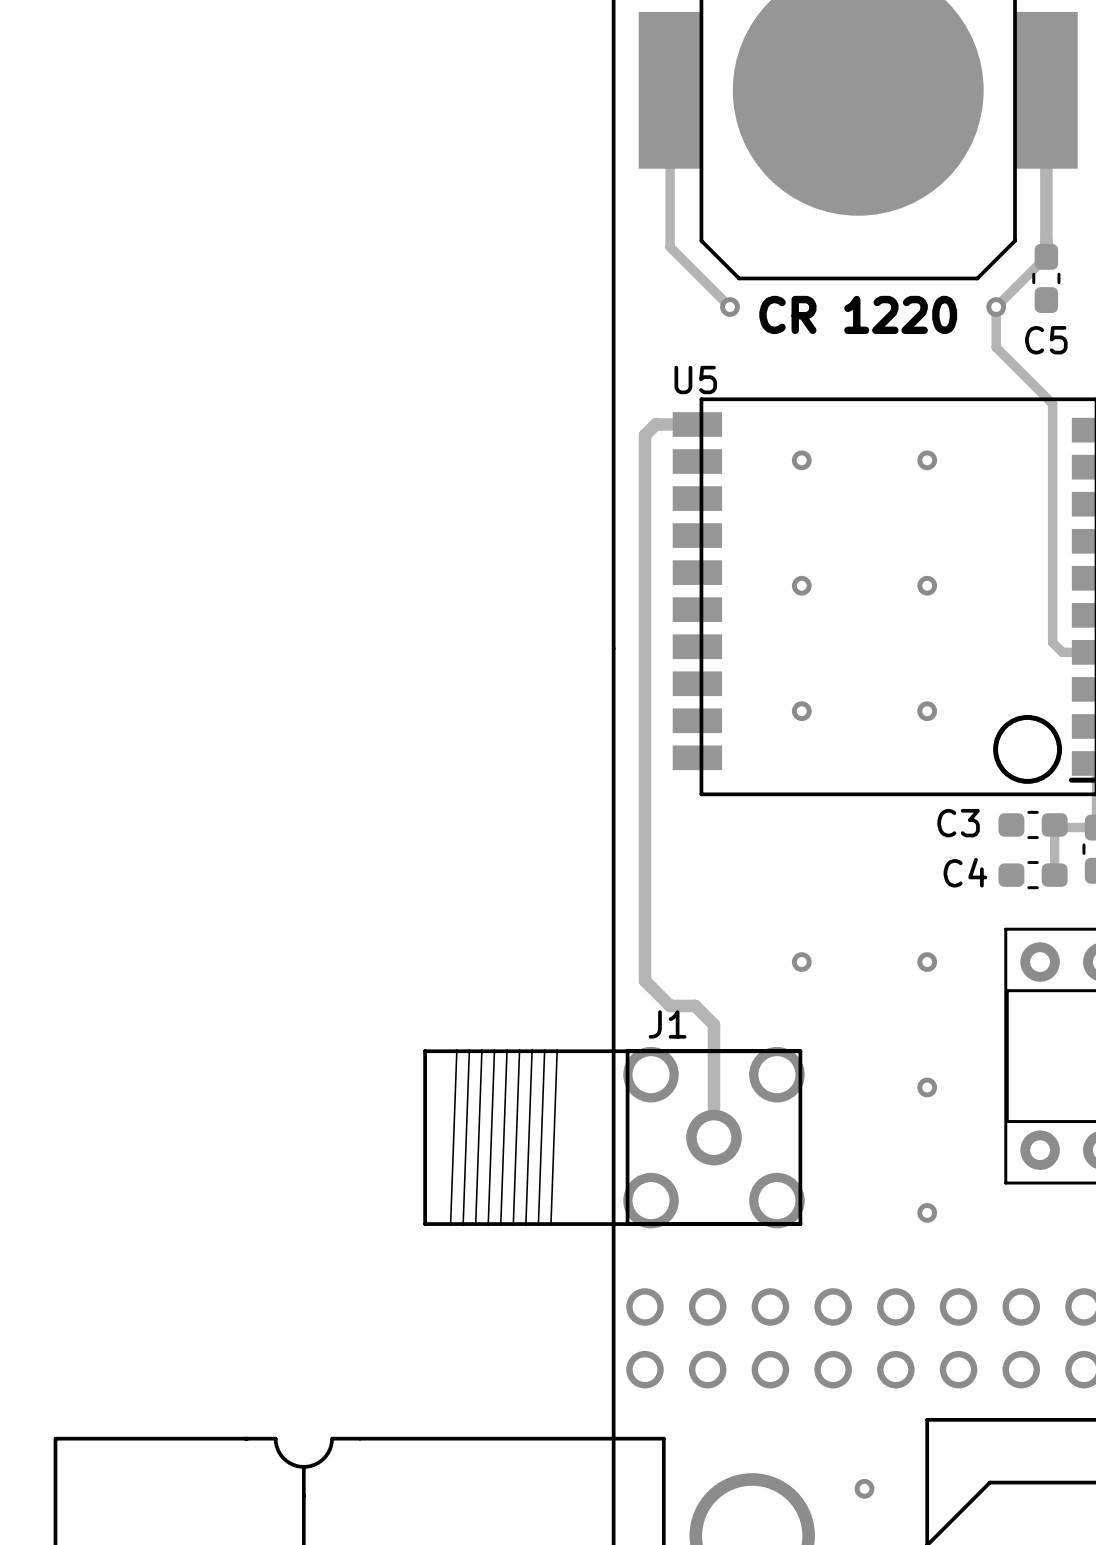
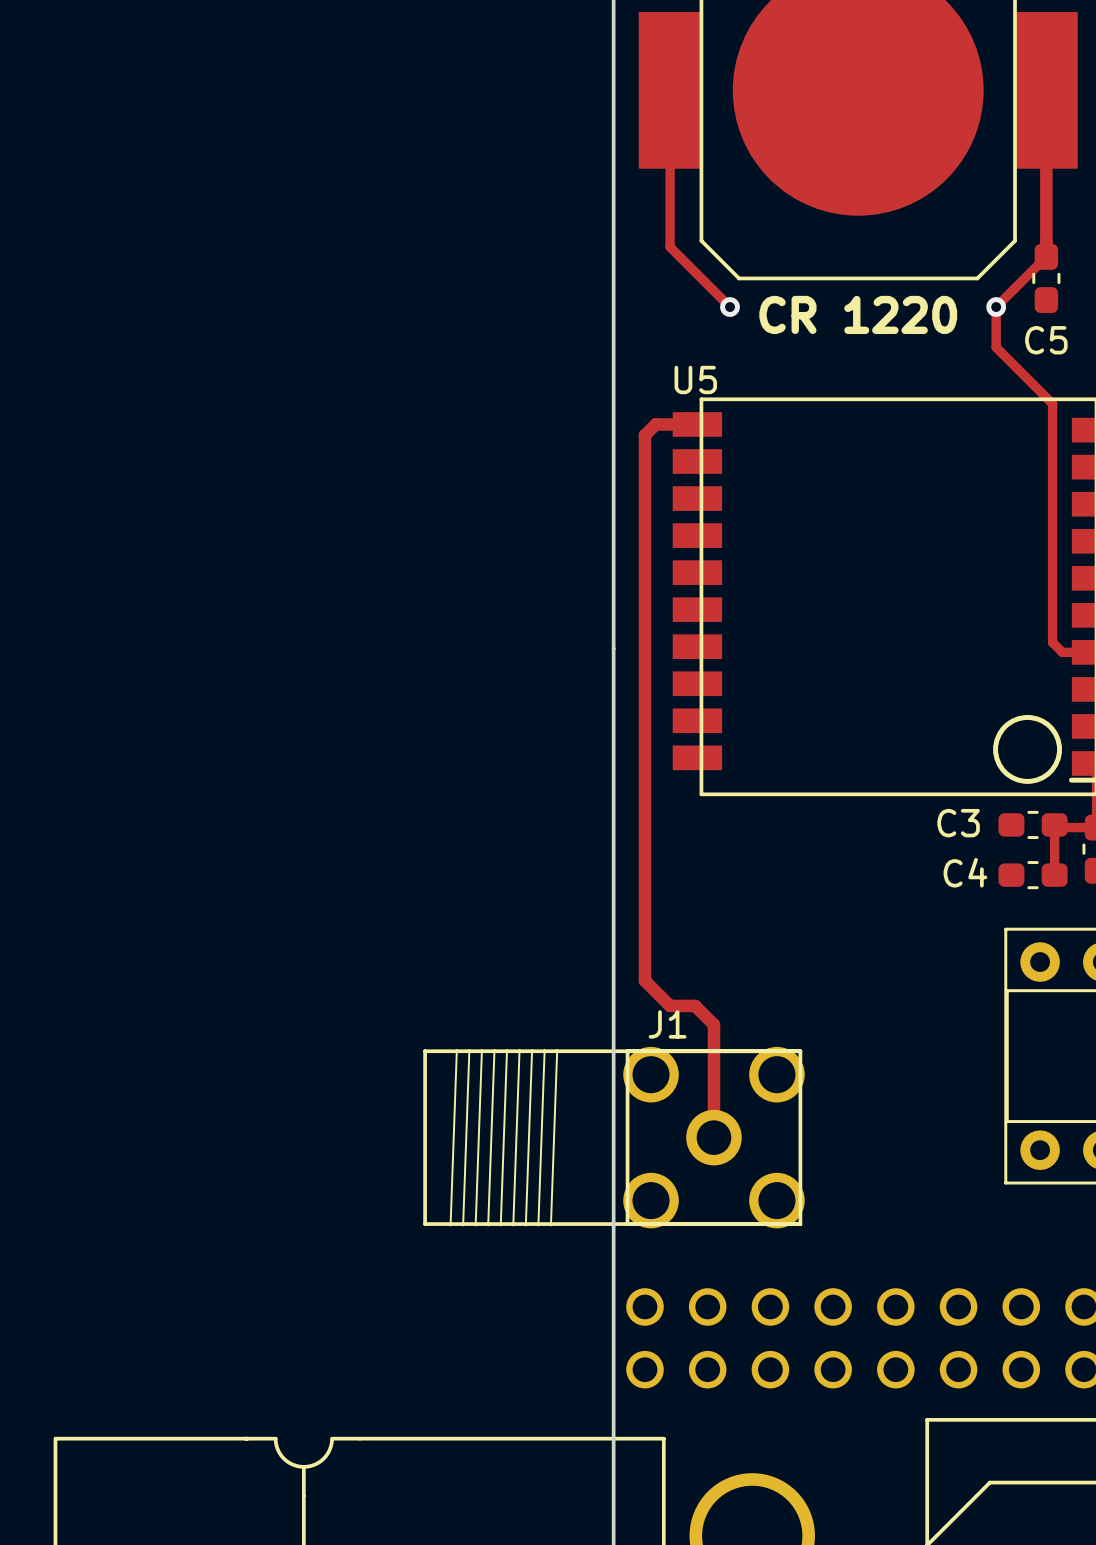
via: (801, 460) -> none
via: (927, 460) -> none
via: (801, 585) -> none
via: (927, 585) -> none
via: (801, 711) -> none
via: (927, 711) -> none
via: (801, 962) -> none
via: (927, 962) -> none
via: (927, 1087) -> none
via: (927, 1212) -> none
via: (864, 1488) -> none

